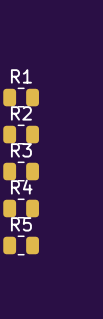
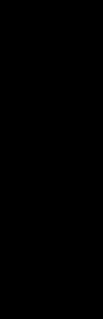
R1: (21, 97) -> none
R2: (21, 134) -> none
R3: (21, 171) -> none
R4: (21, 208) -> none
R5: (21, 245) -> none

